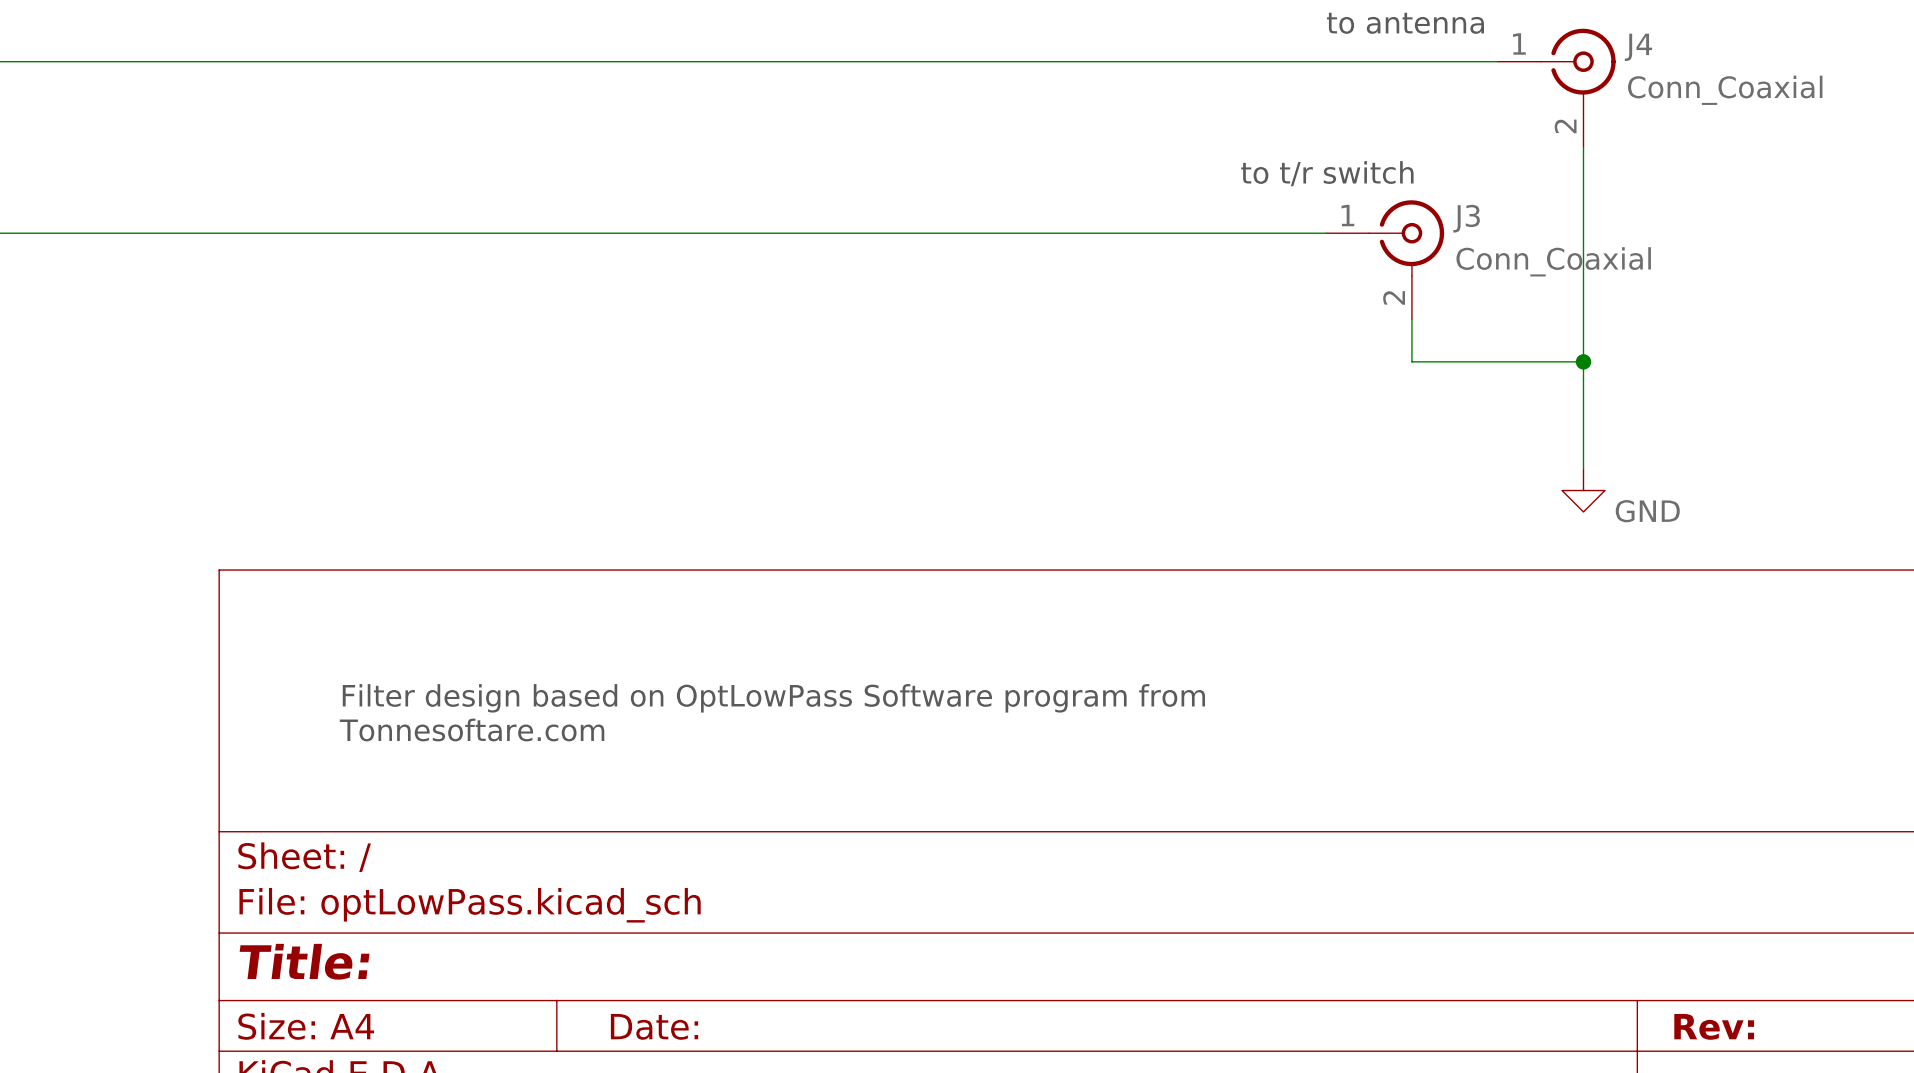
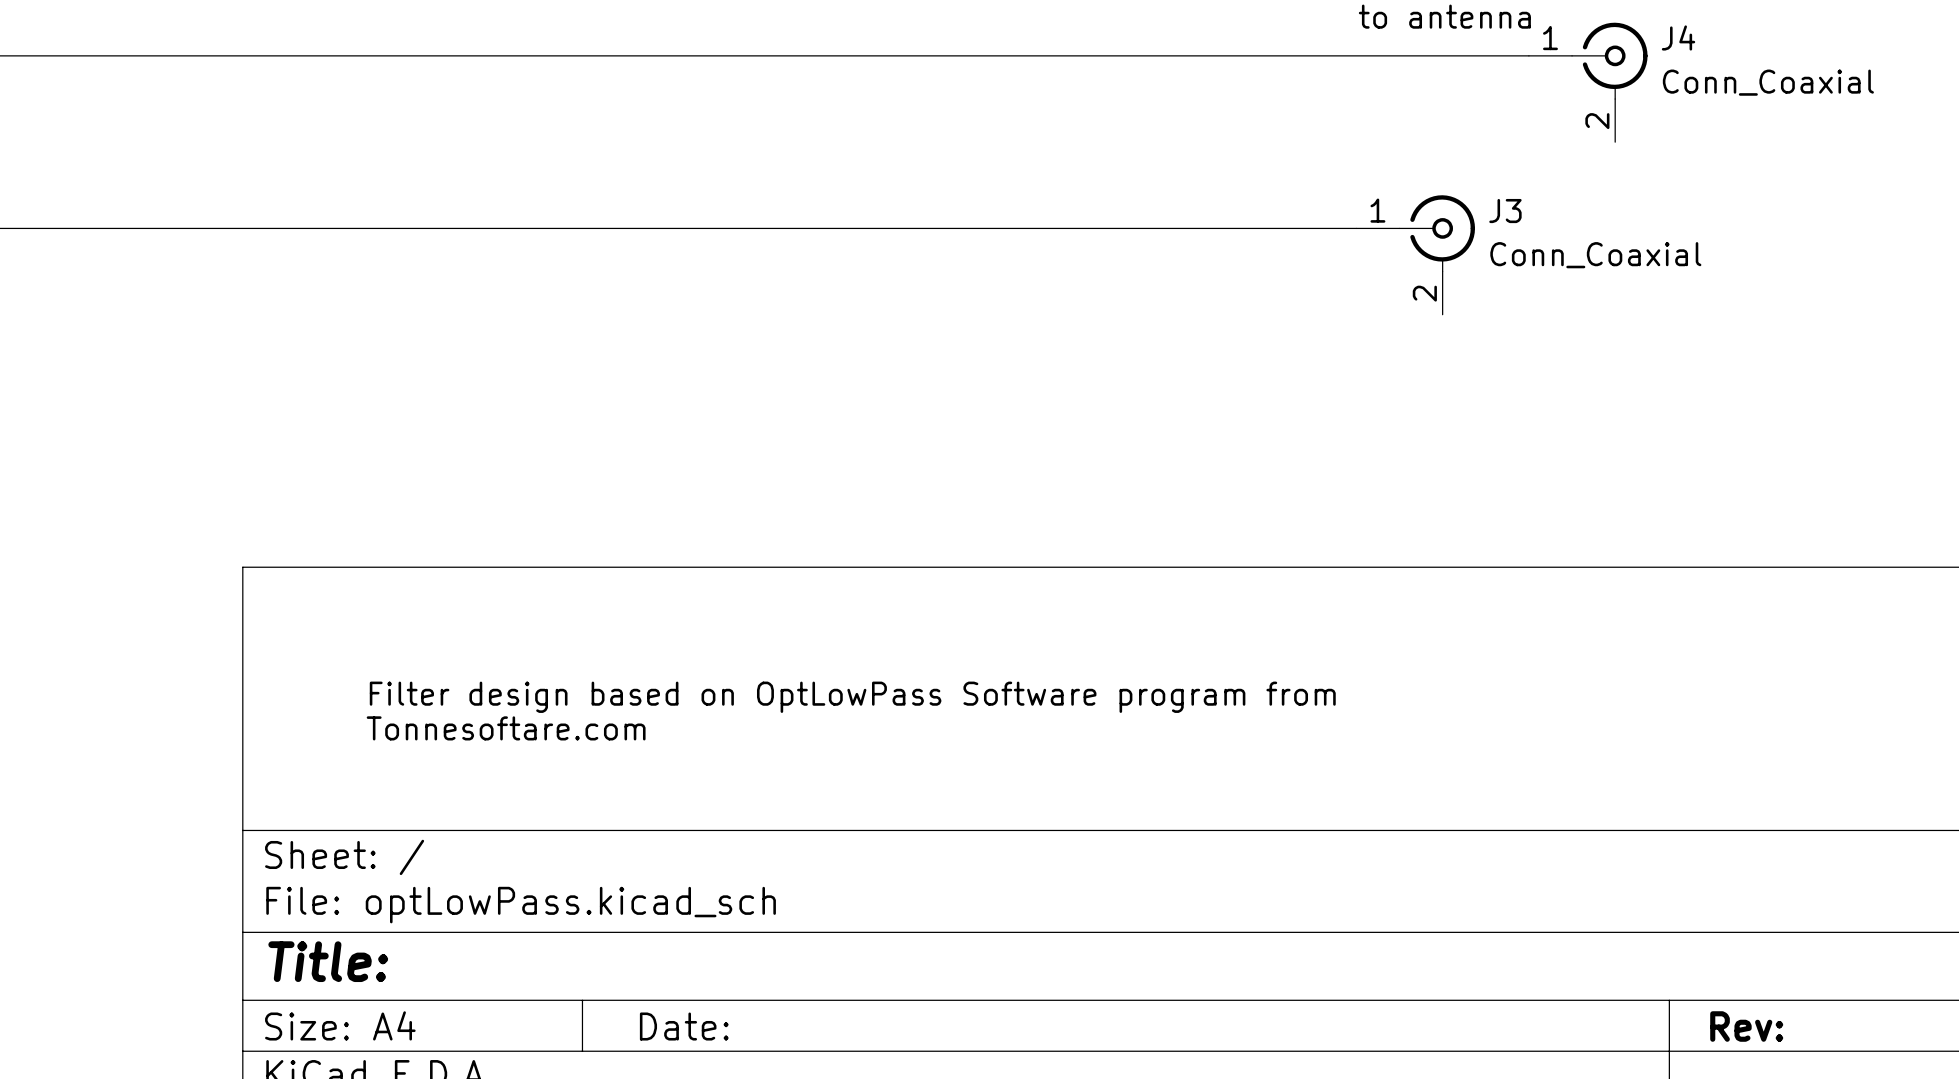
wire: (1583, 147) (1583, 469) -> none
text: to t/r switch (1327, 173) -> none
wire: (1411, 318) (1411, 361) (1583, 361) -> none
junction: (1583, 361) -> none
power symbol: GND (1583, 490) -> none

